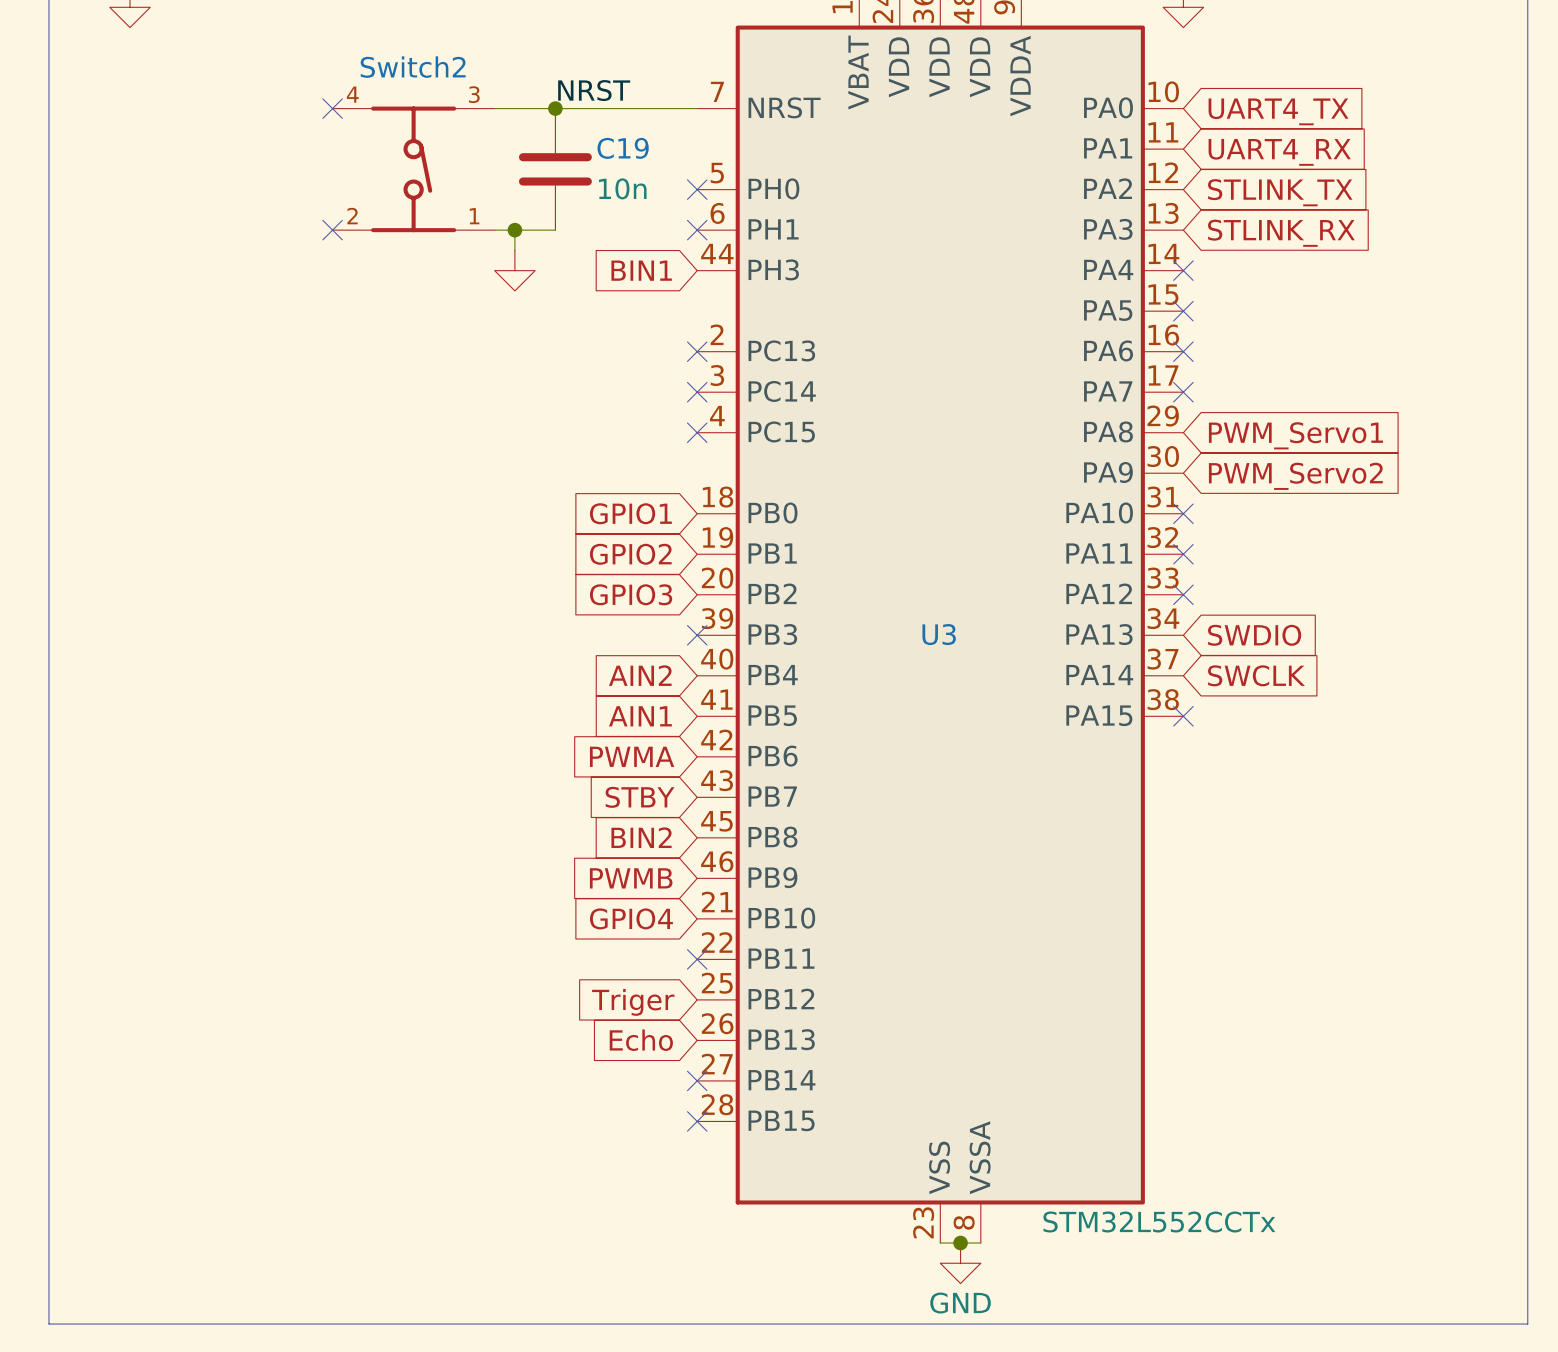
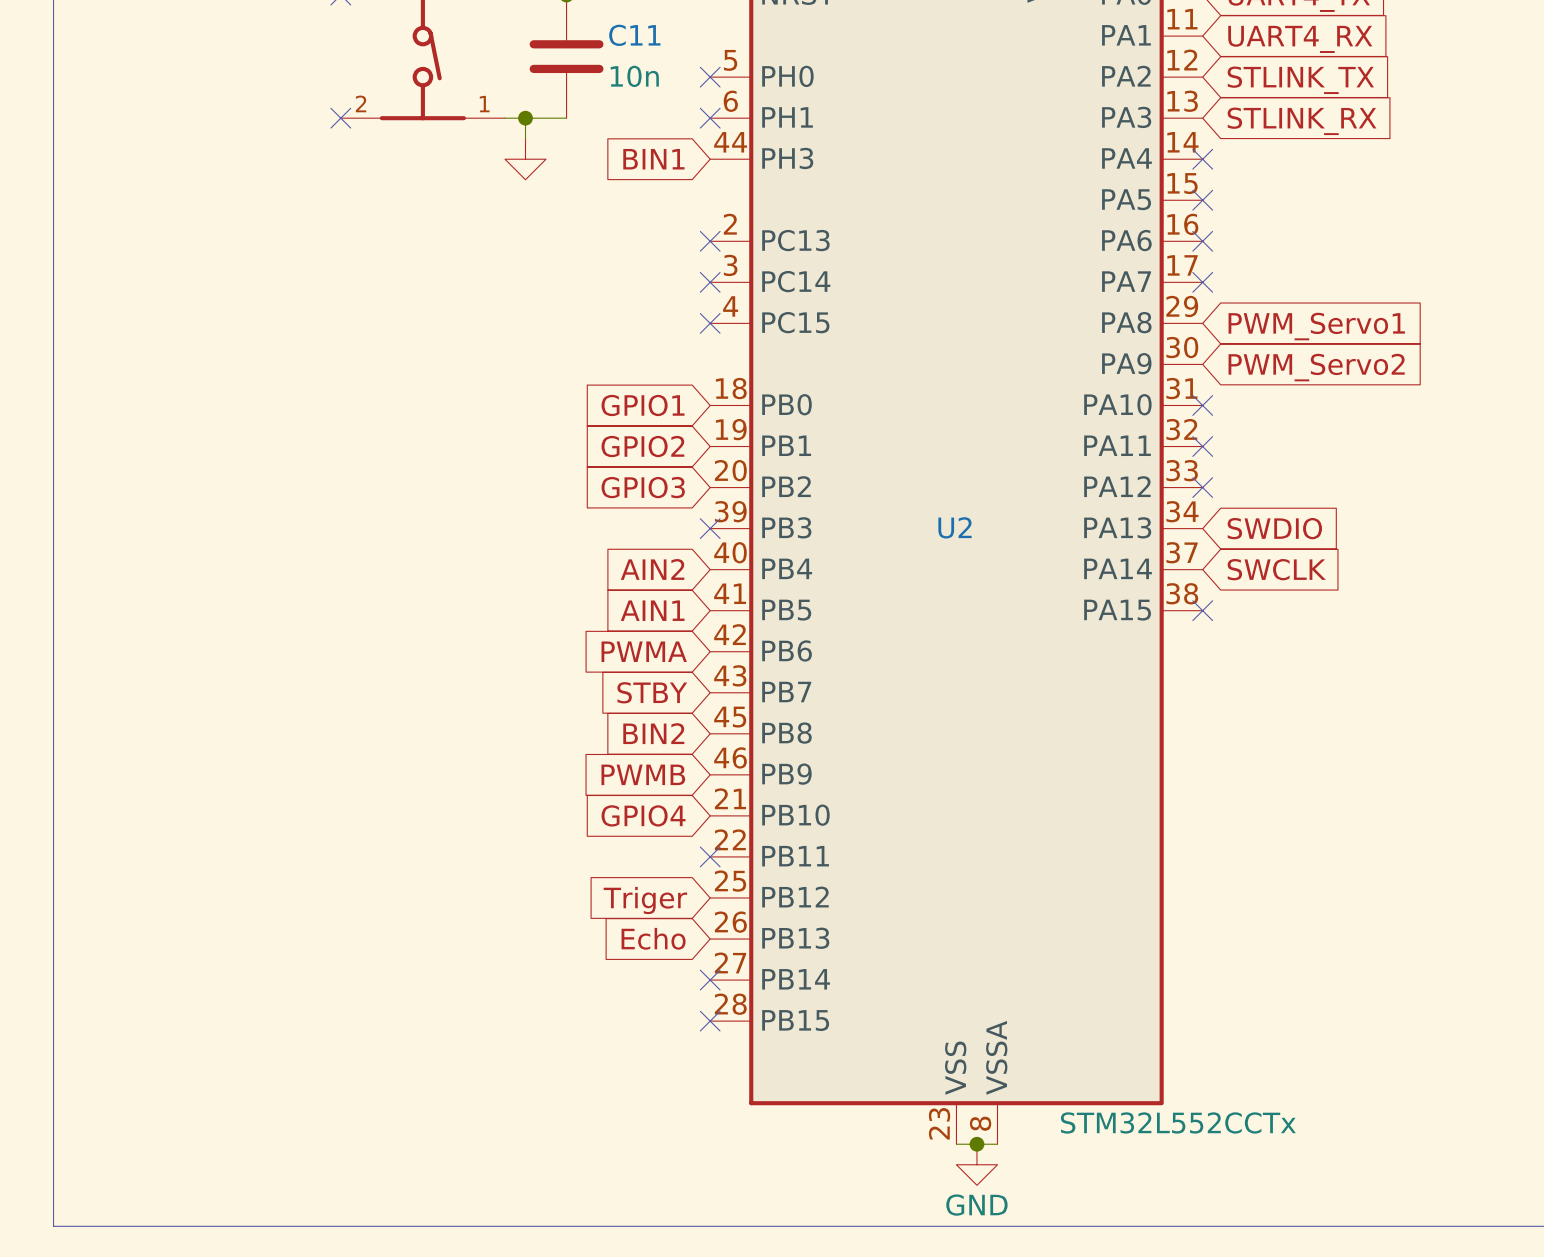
C19 name: C19 (623, 148) -> C11 (634, 35)
U3 name: U3 (939, 634) -> U2 (955, 527)

